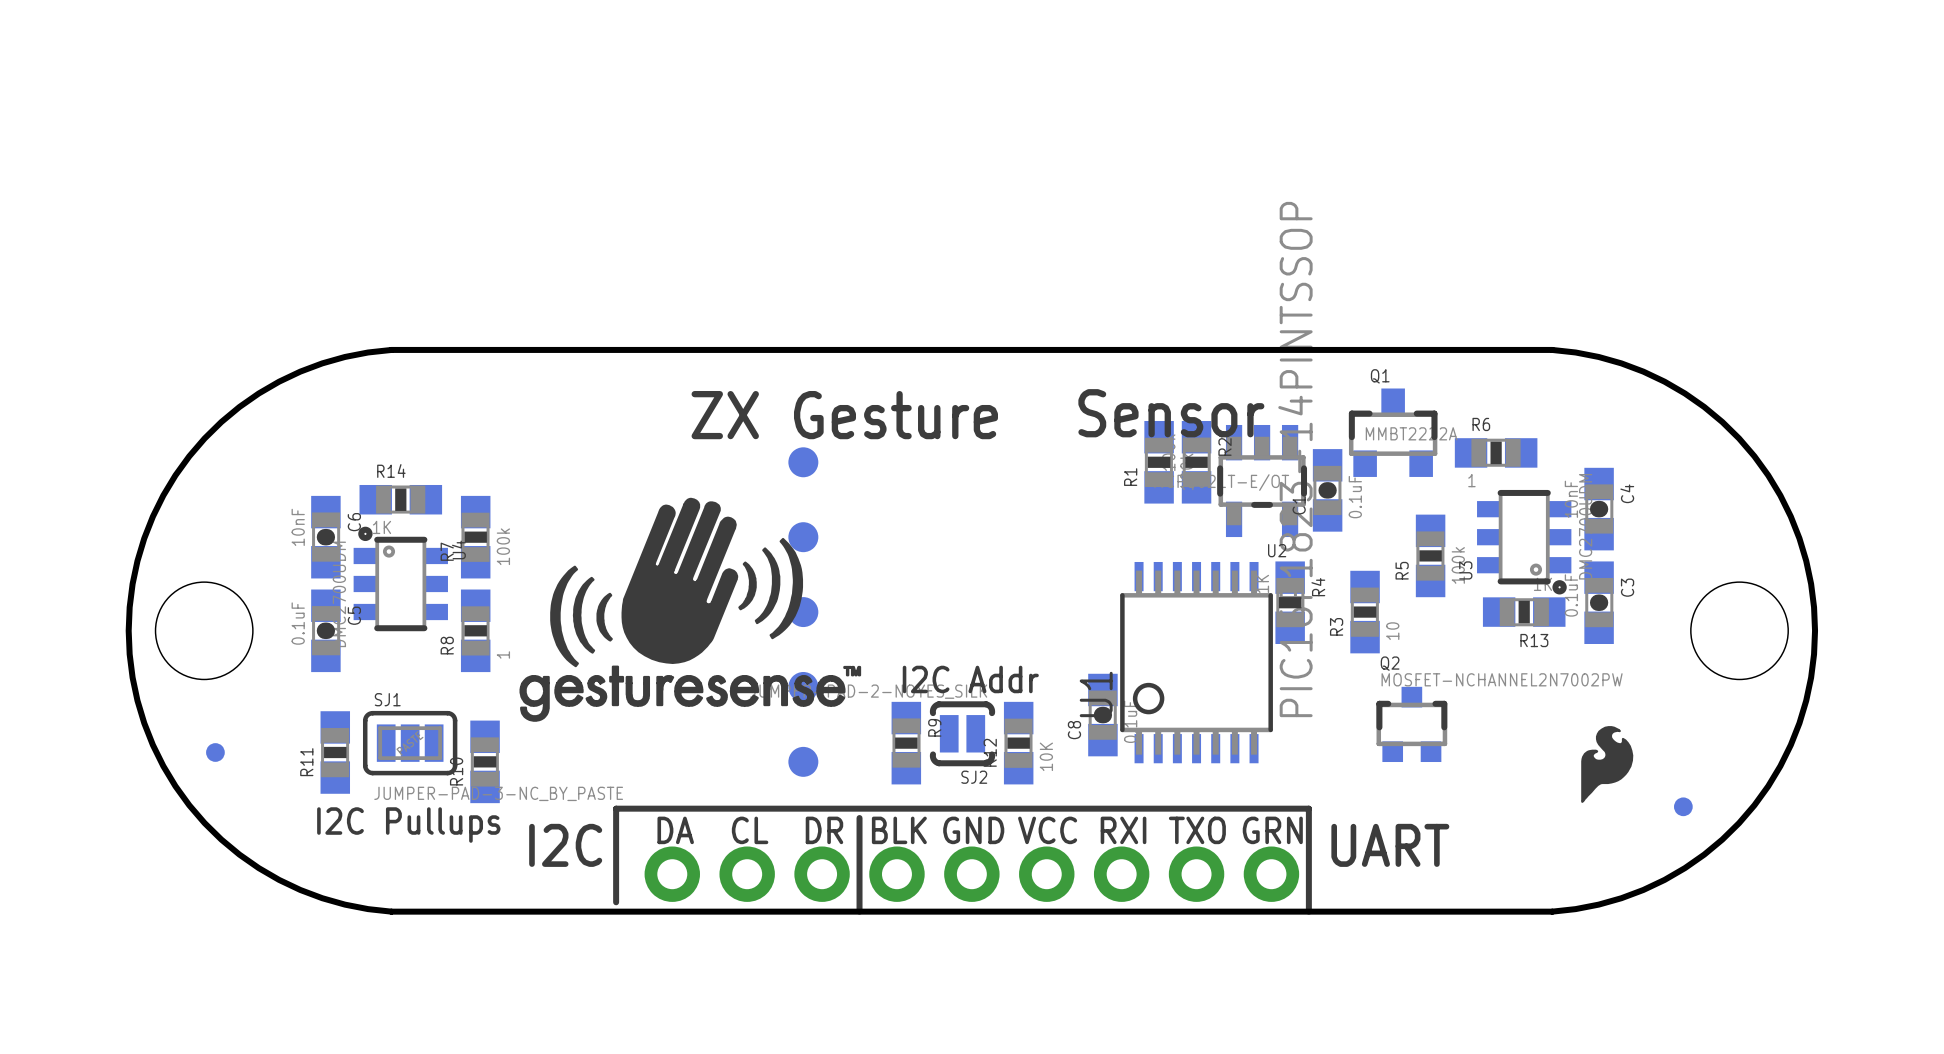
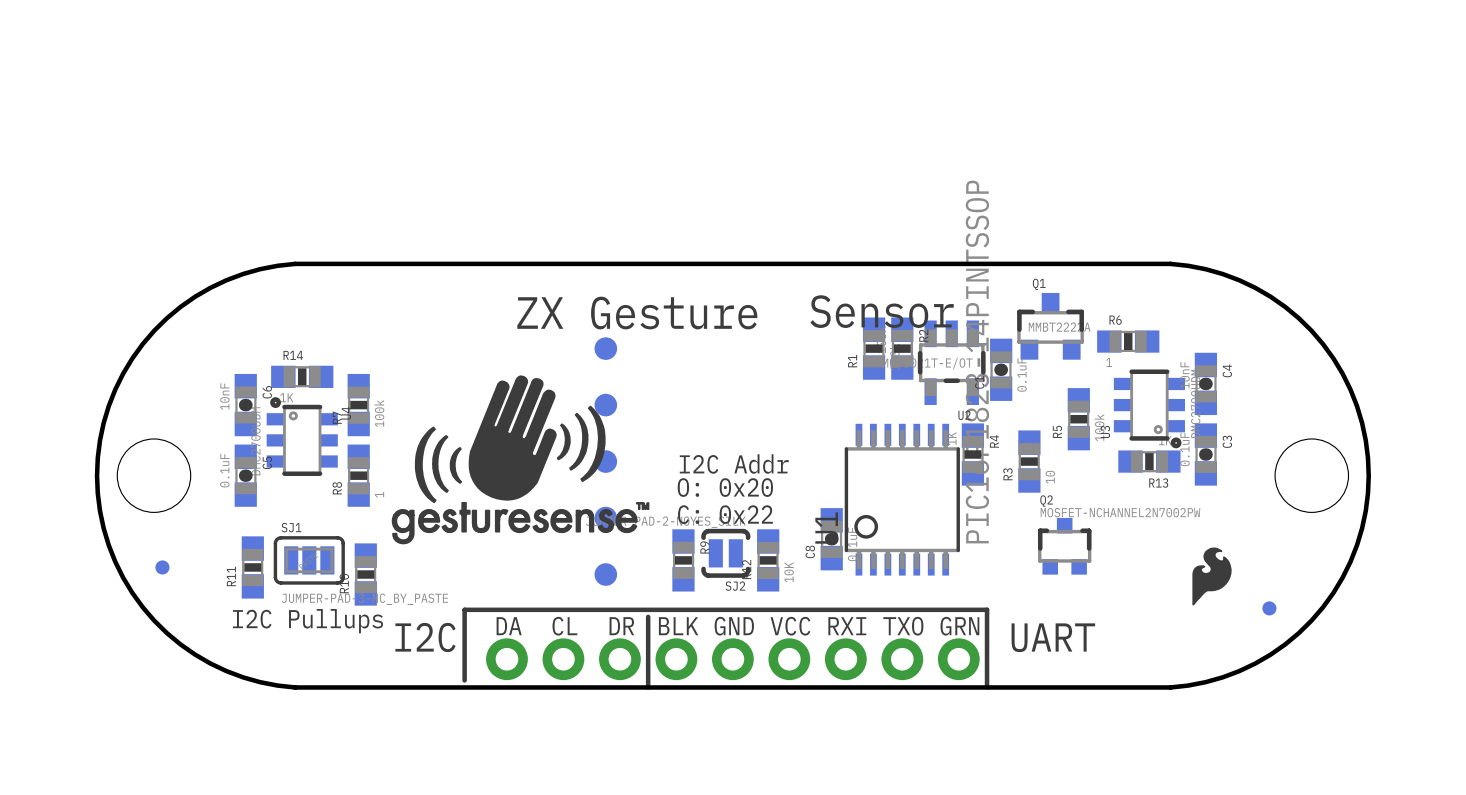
text: none -> O: 0x20 (725, 487)
text position: I2C Addr (970, 679) -> I2C Addr (734, 464)
text: none -> C: 0x22 (725, 514)

